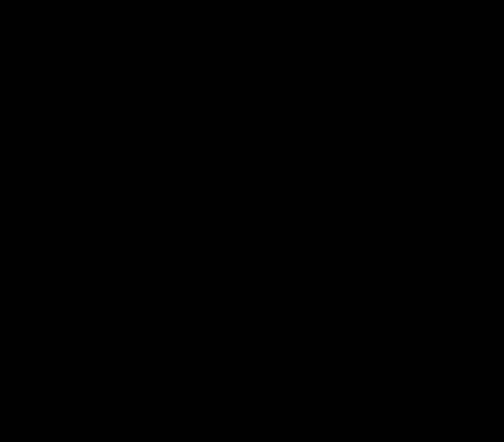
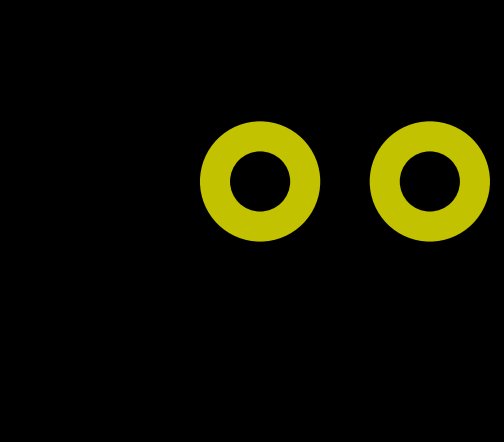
part: none -> (344, 181)

